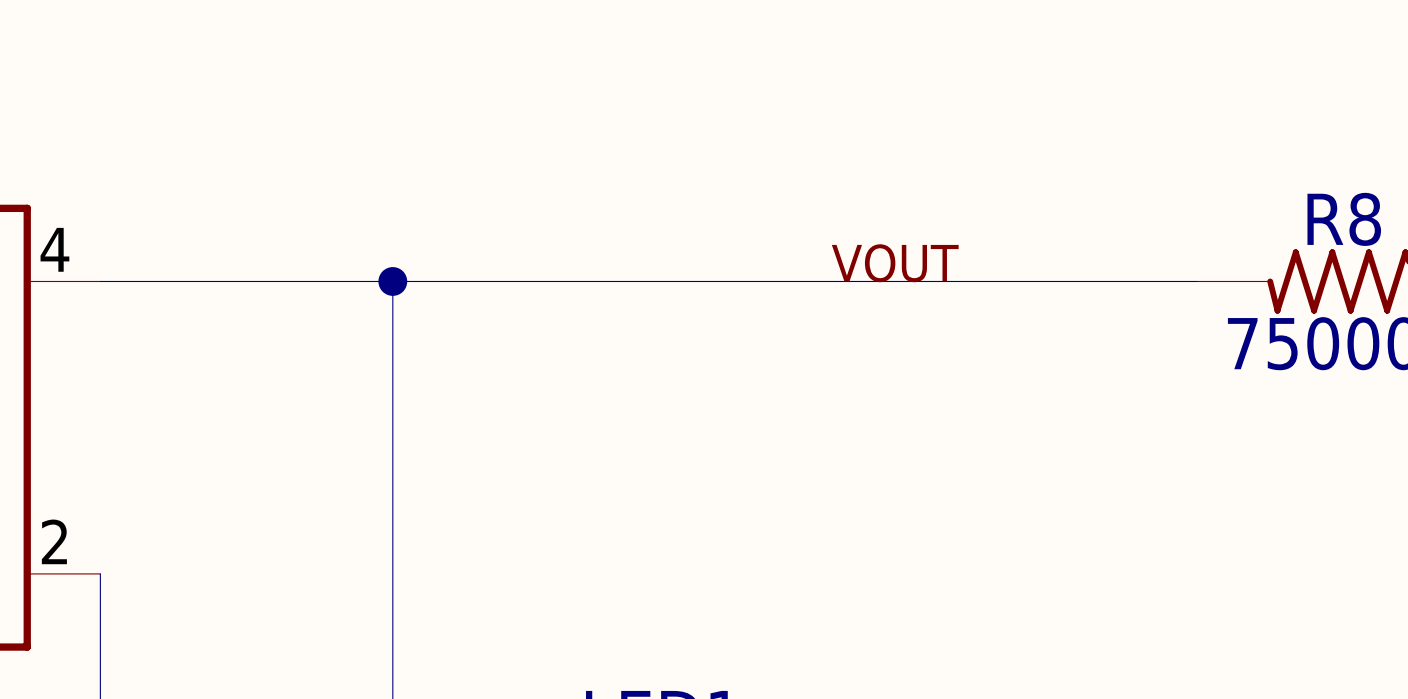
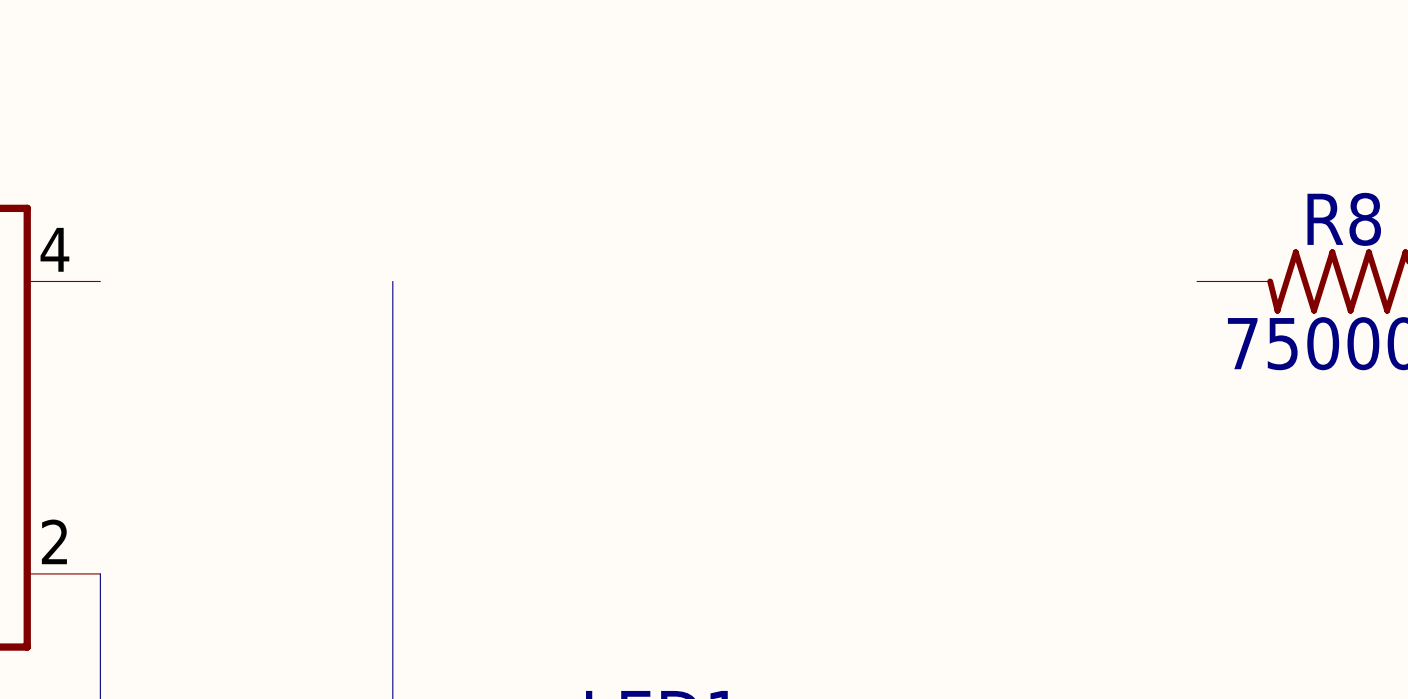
label: VOUT (895, 263) -> none
wire: (100, 281) (1197, 281) -> none
junction: (392, 281) -> none

